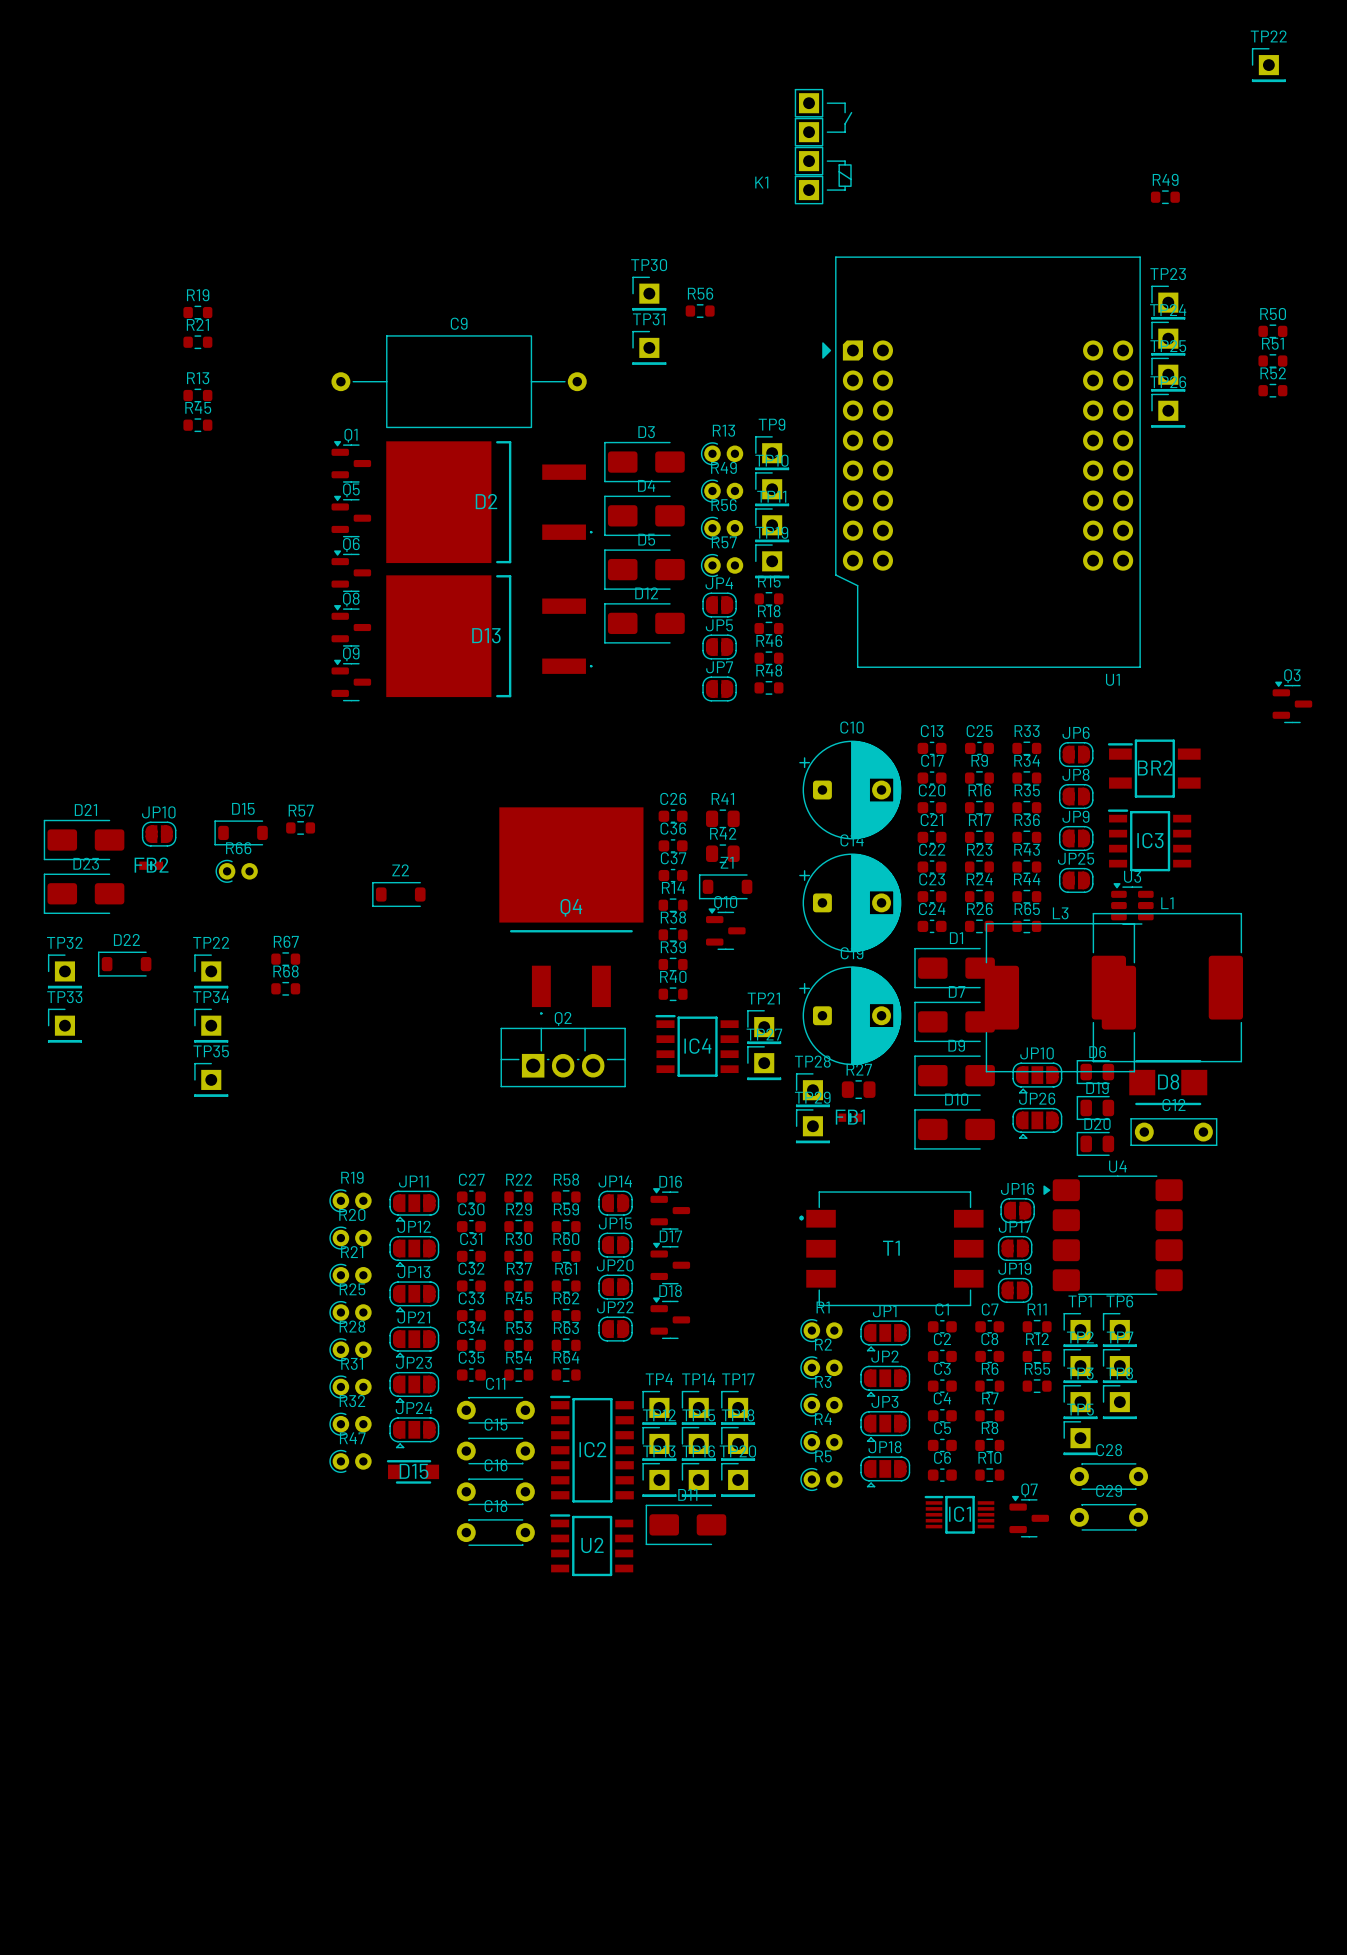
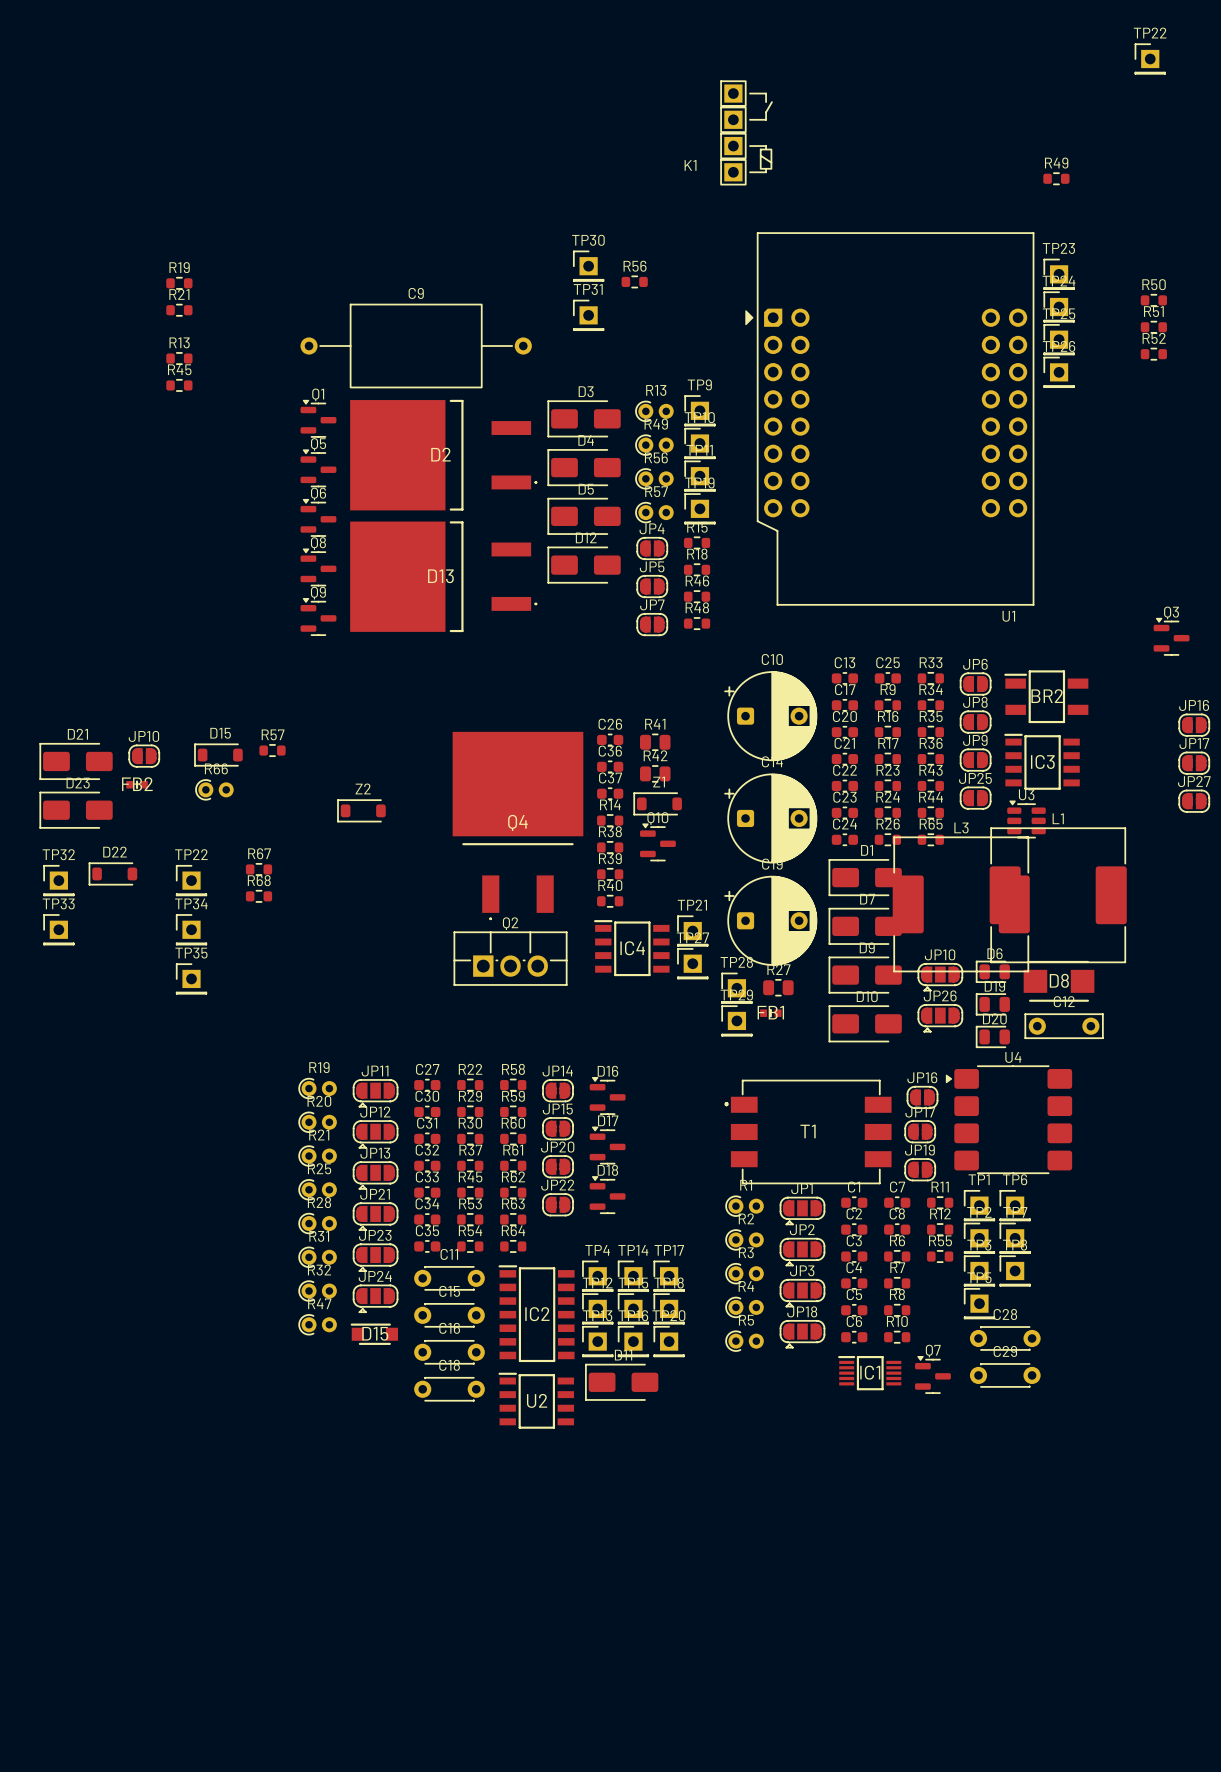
JP16: none -> (1194, 725)
JP17: none -> (1194, 763)
JP27: none -> (1194, 801)

